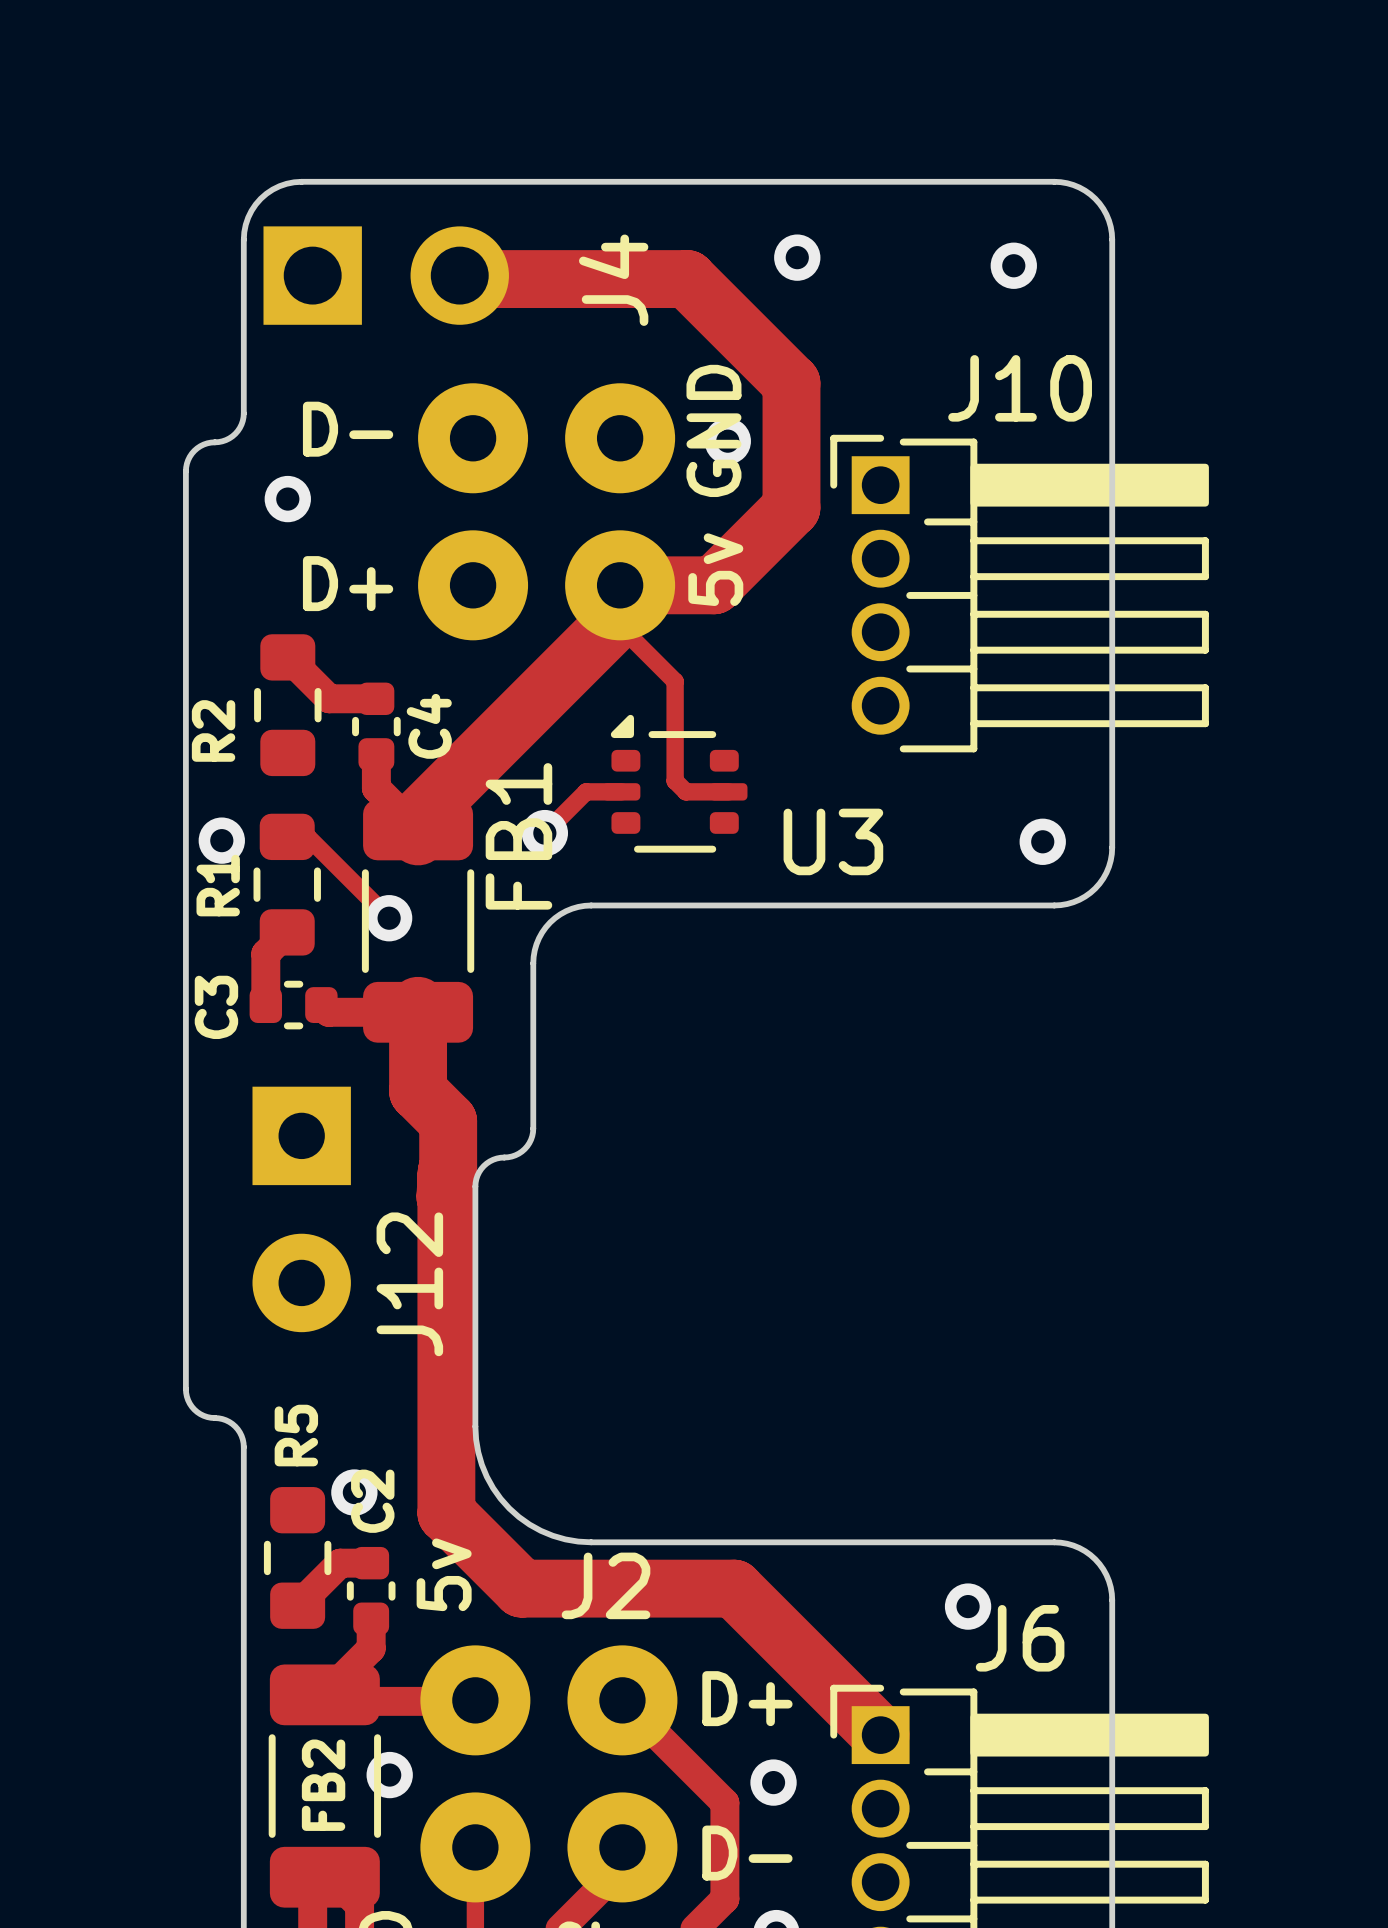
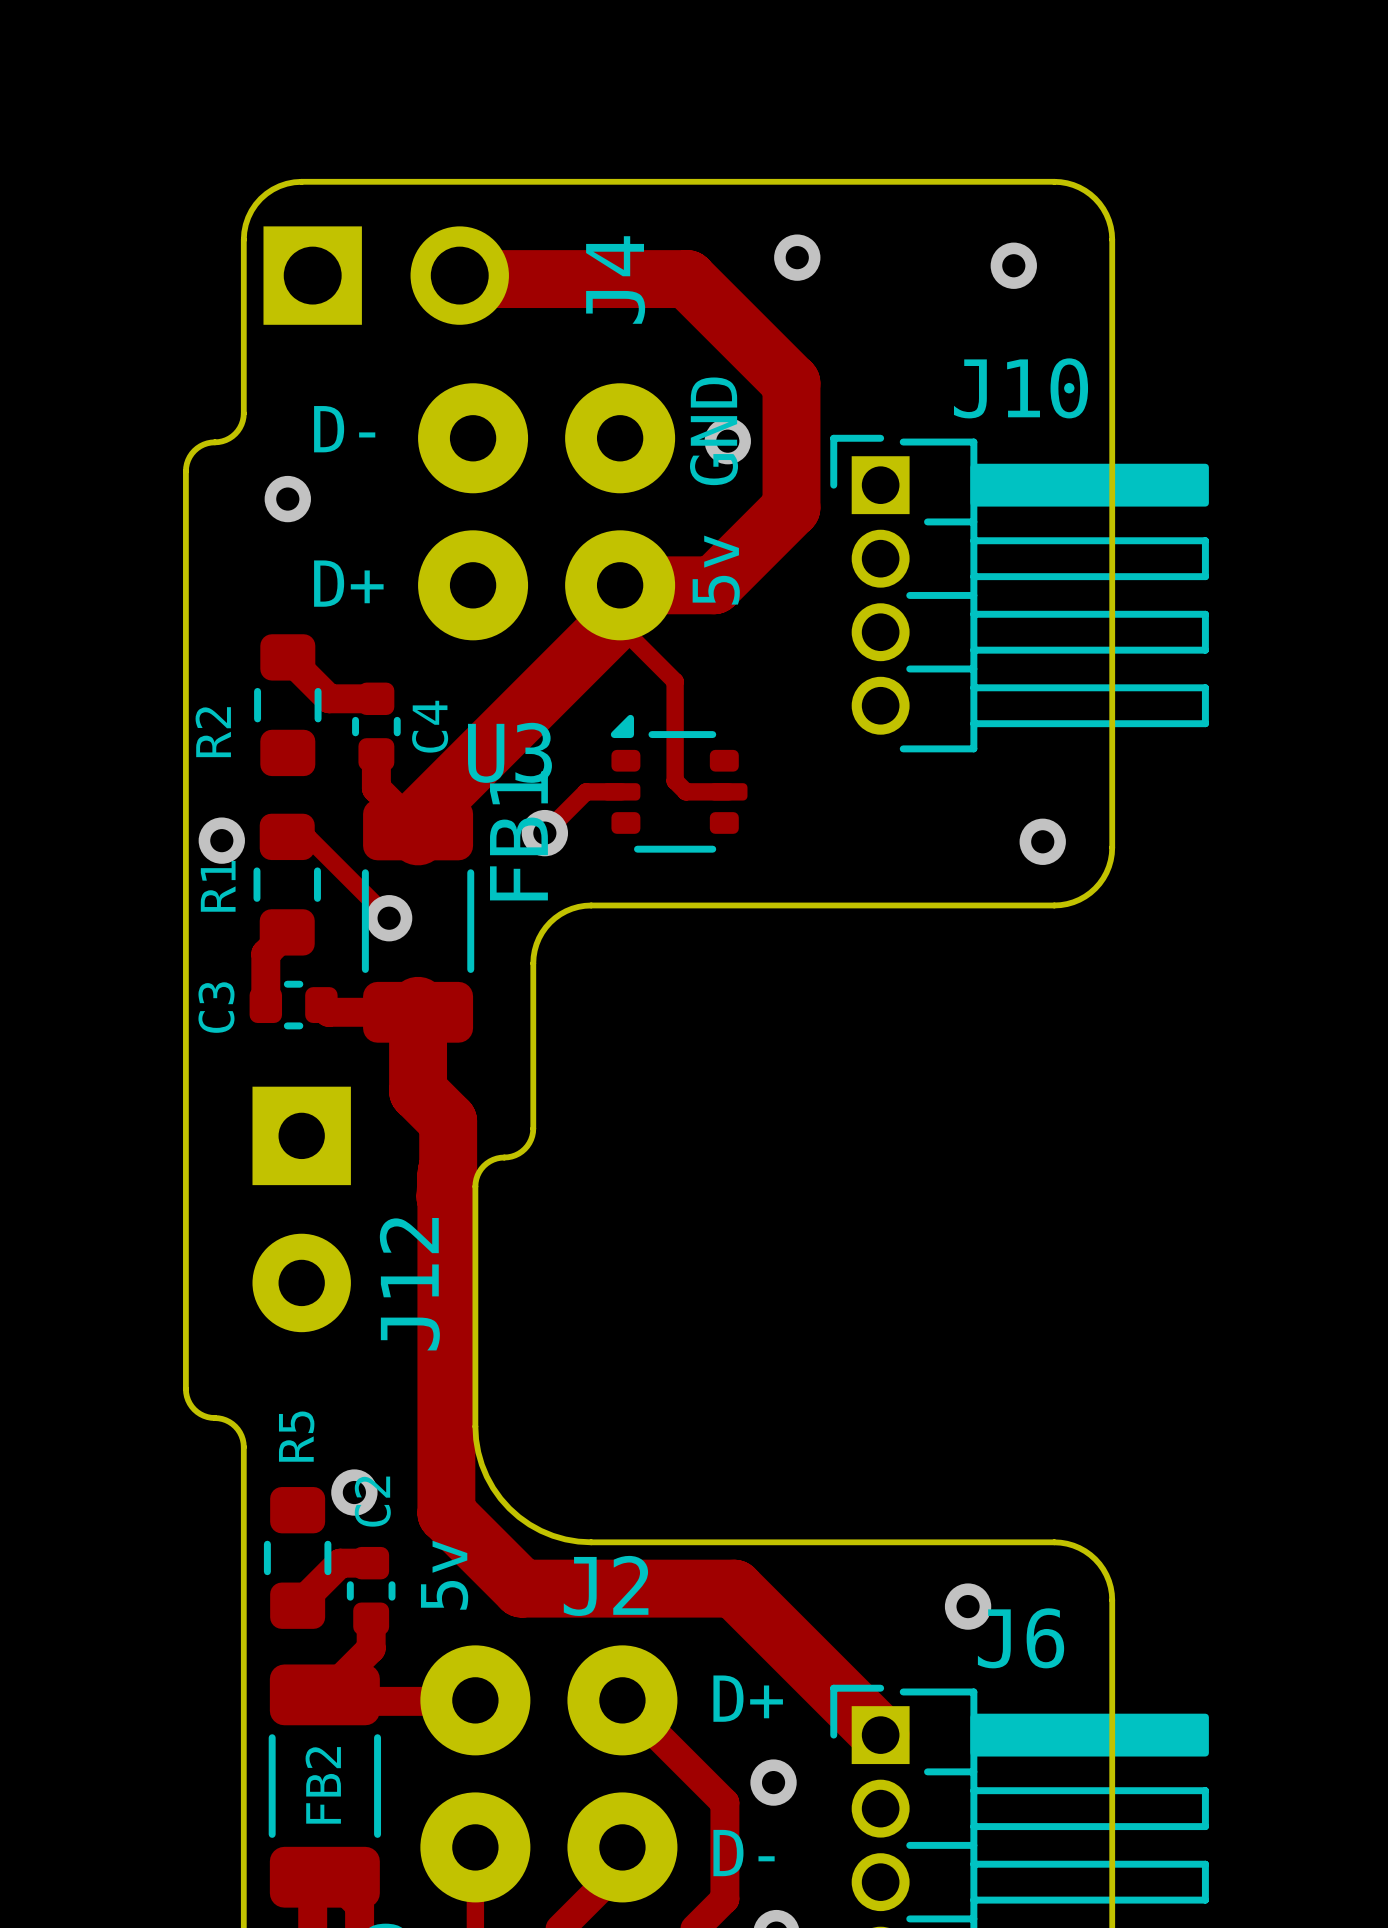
U3 name position: U3 (833, 841) -> U3 (509, 752)
via: (389, 1775) -> none

